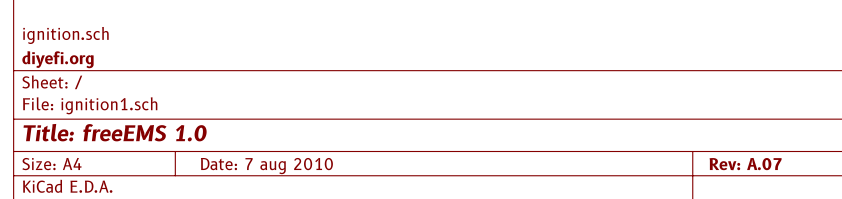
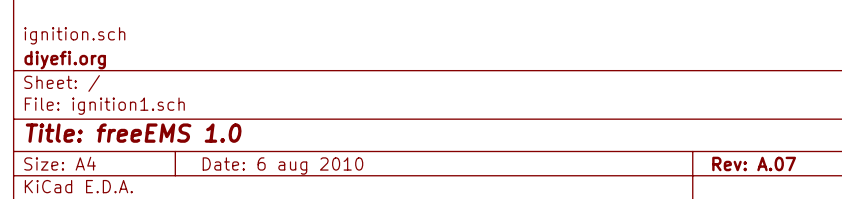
title block: Date: 7 aug 2010 (266, 166) -> Date: 6 aug 2010 (282, 166)

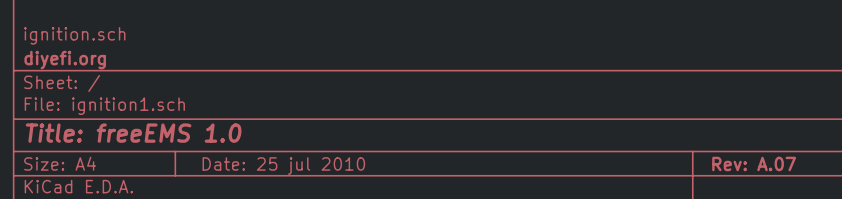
title block: Date: 6 aug 2010 (282, 166) -> Date: 25 jul 2010 (283, 166)

